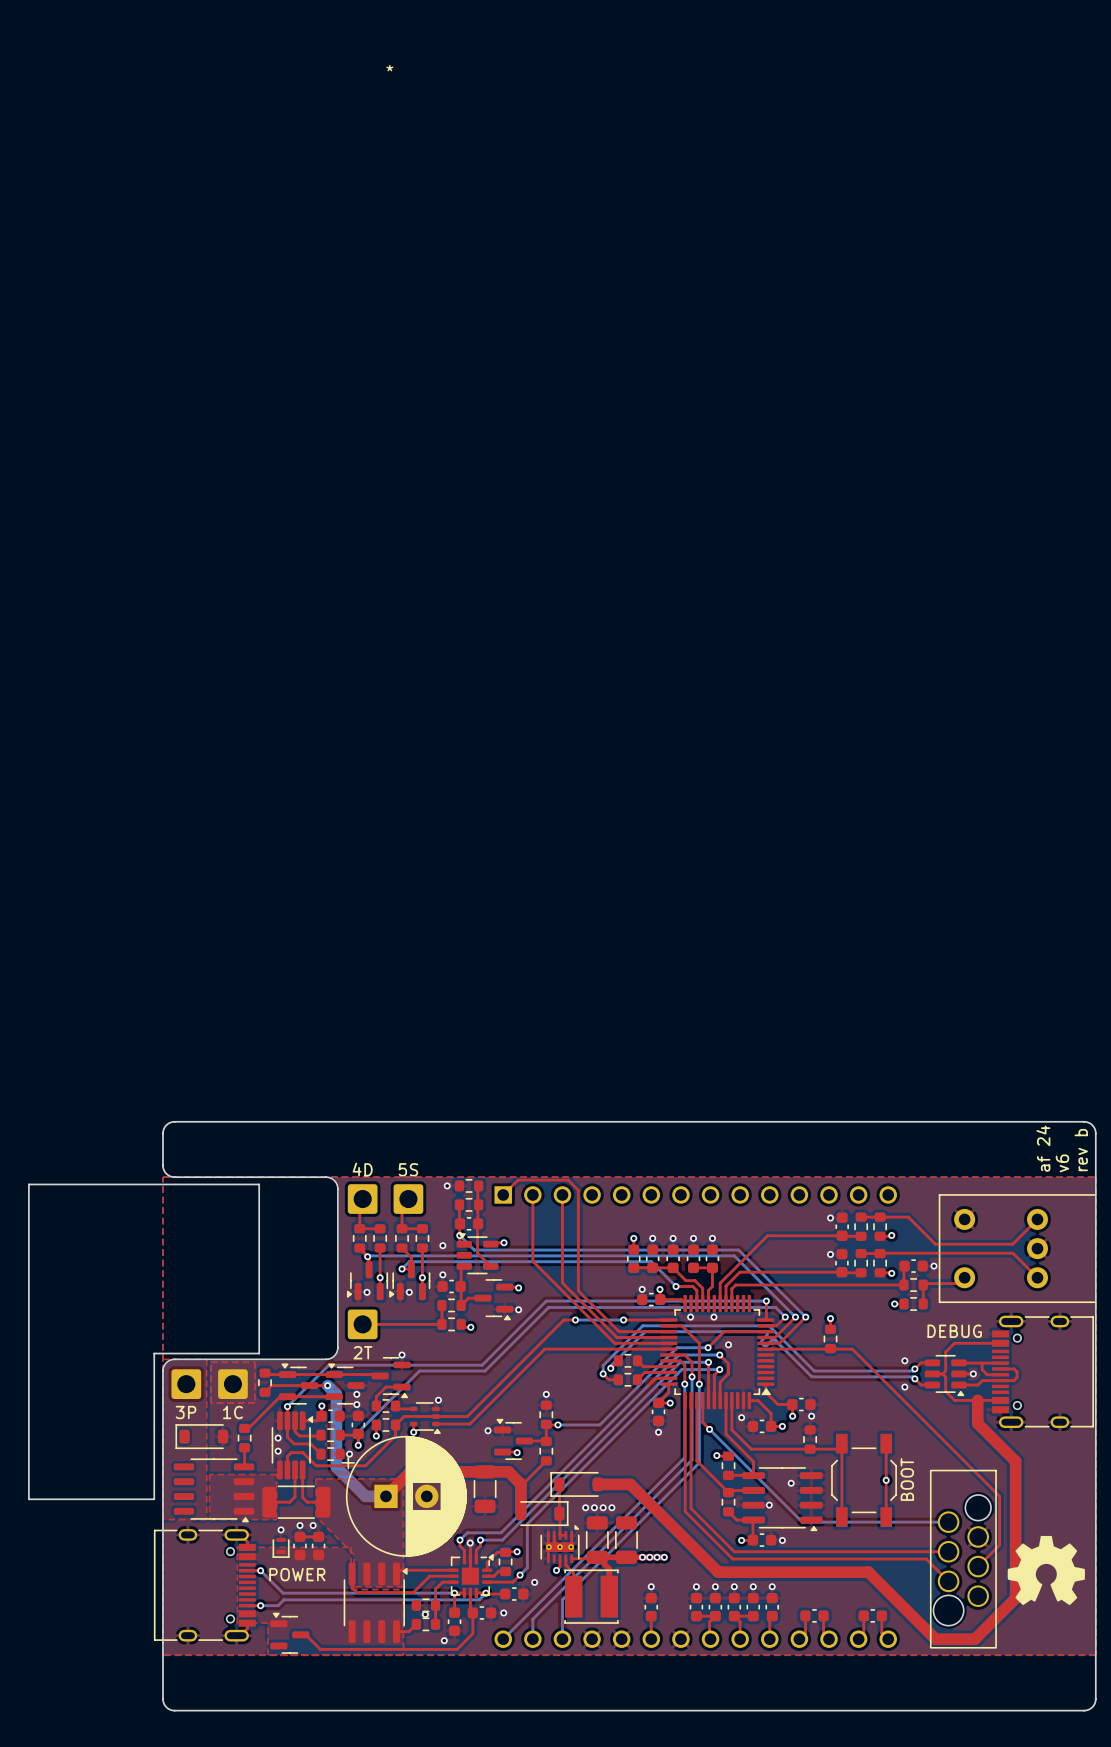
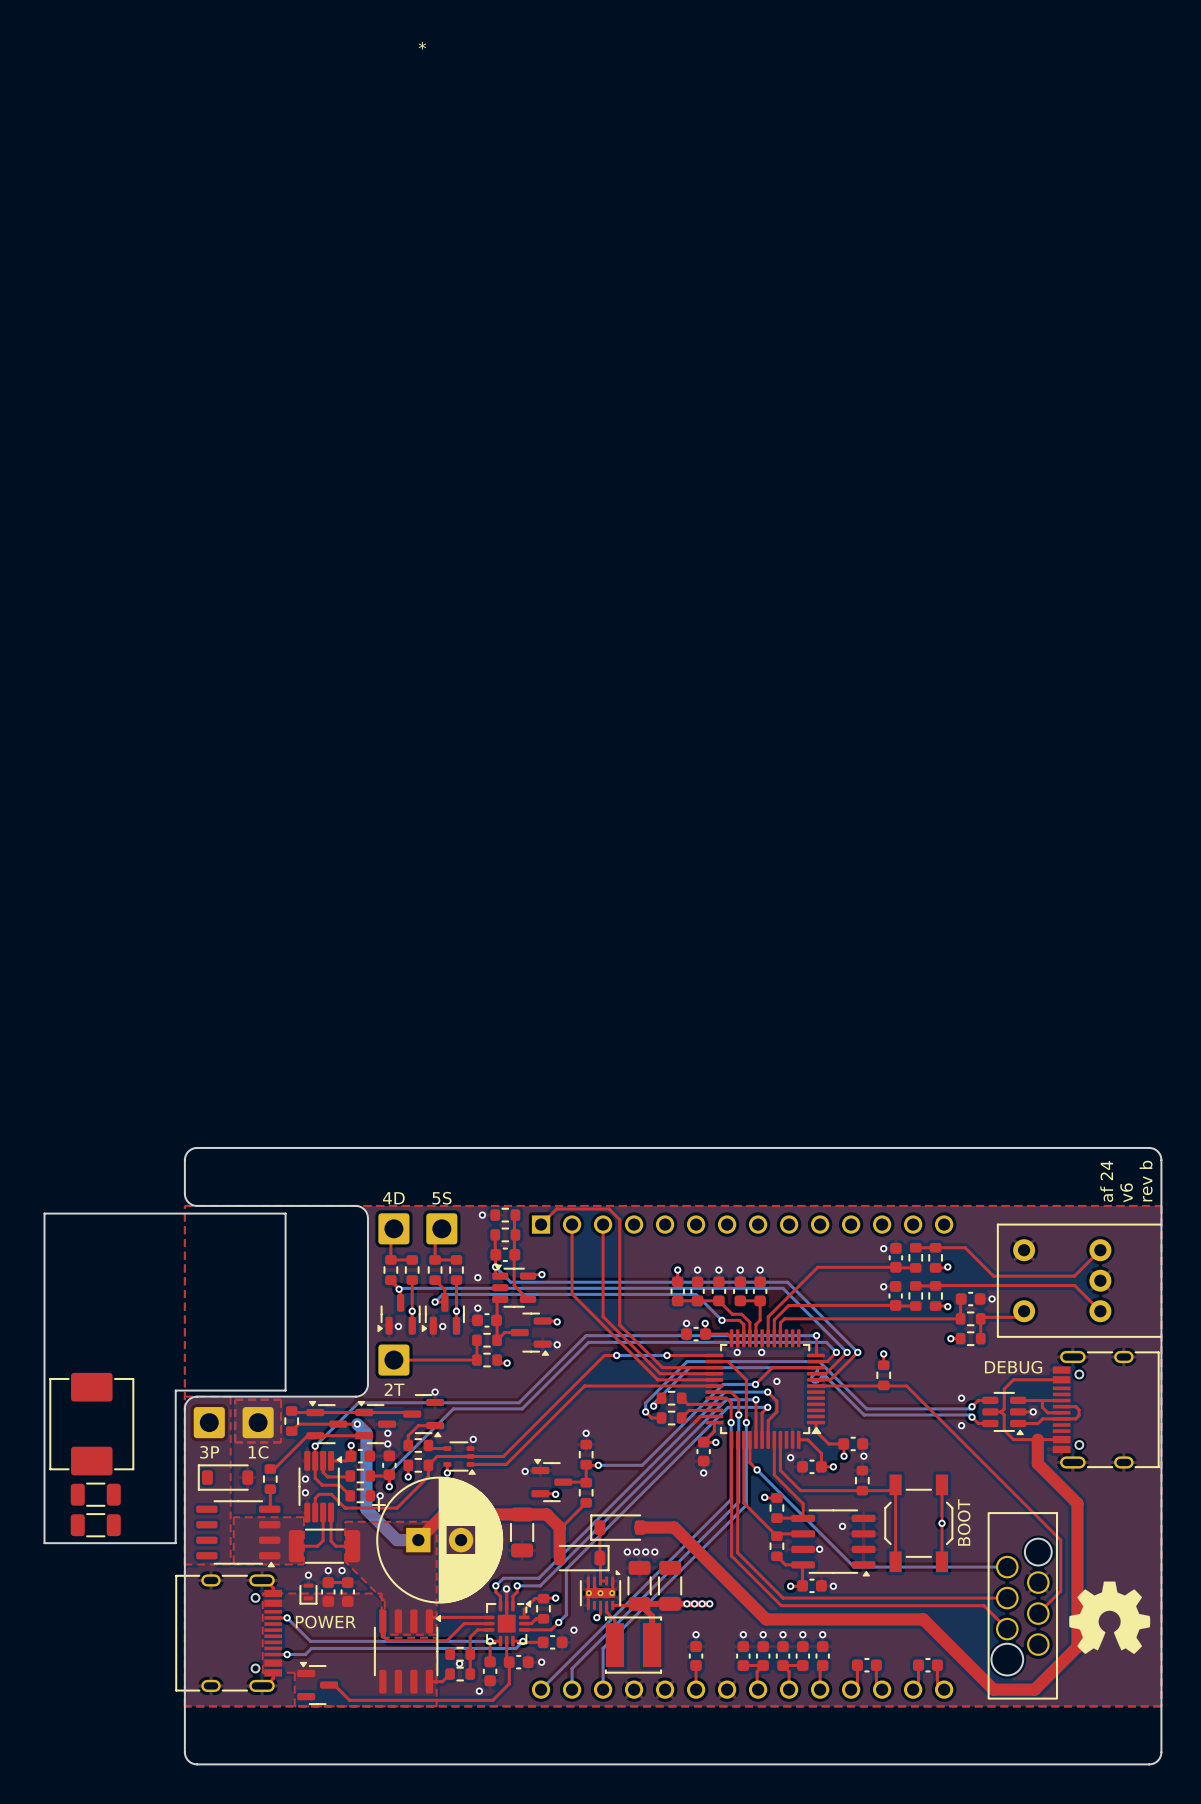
part: none -> (91, 1424)
part: none -> (95, 1494)
part: none -> (95, 1525)

